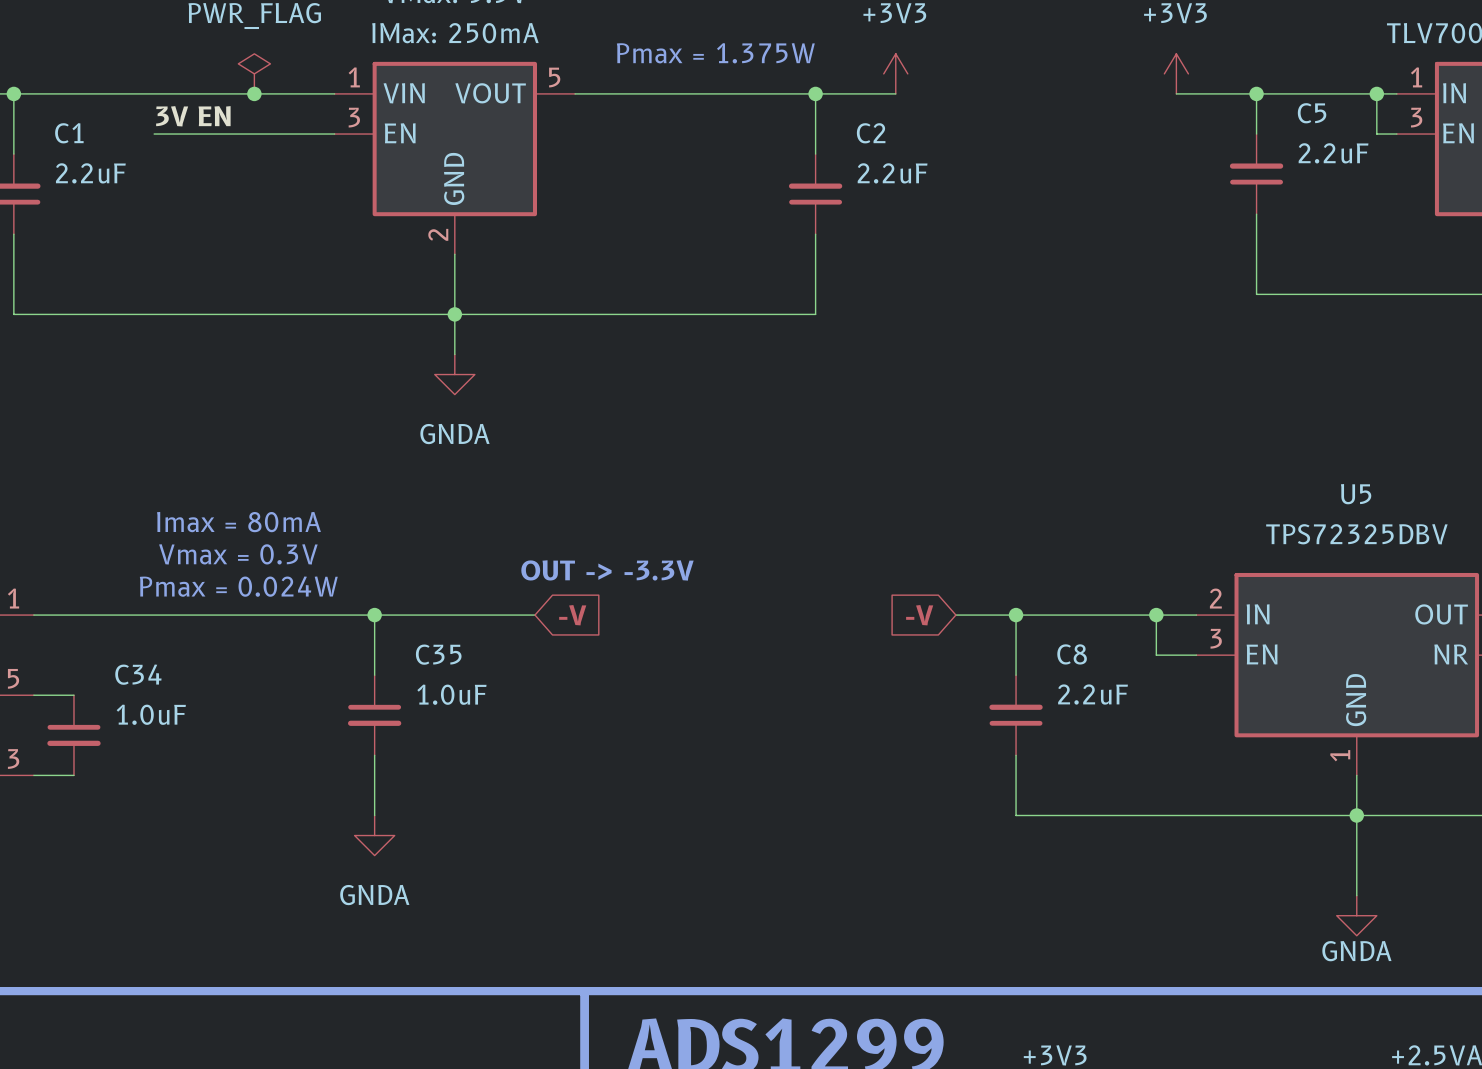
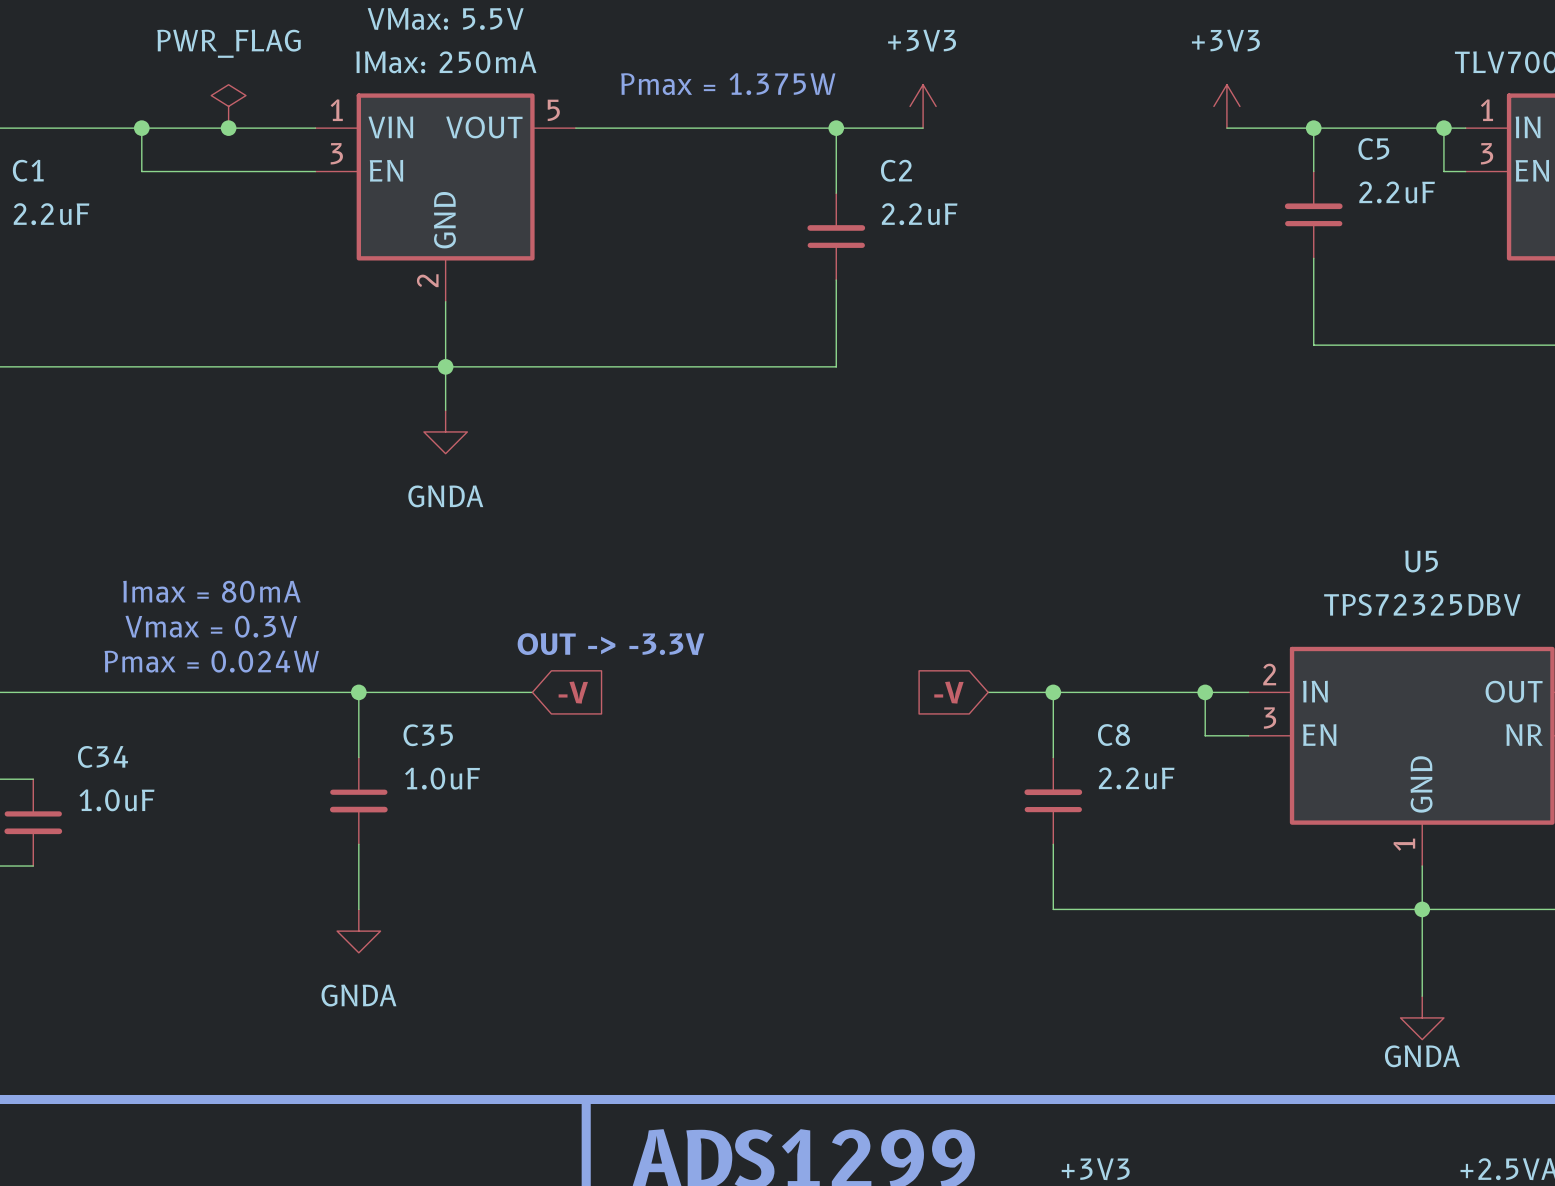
junction: none -> (141, 128)
label: 3V EN (193, 116) -> none
wire: (154, 134) (174, 134) -> (141, 128) (141, 171)

